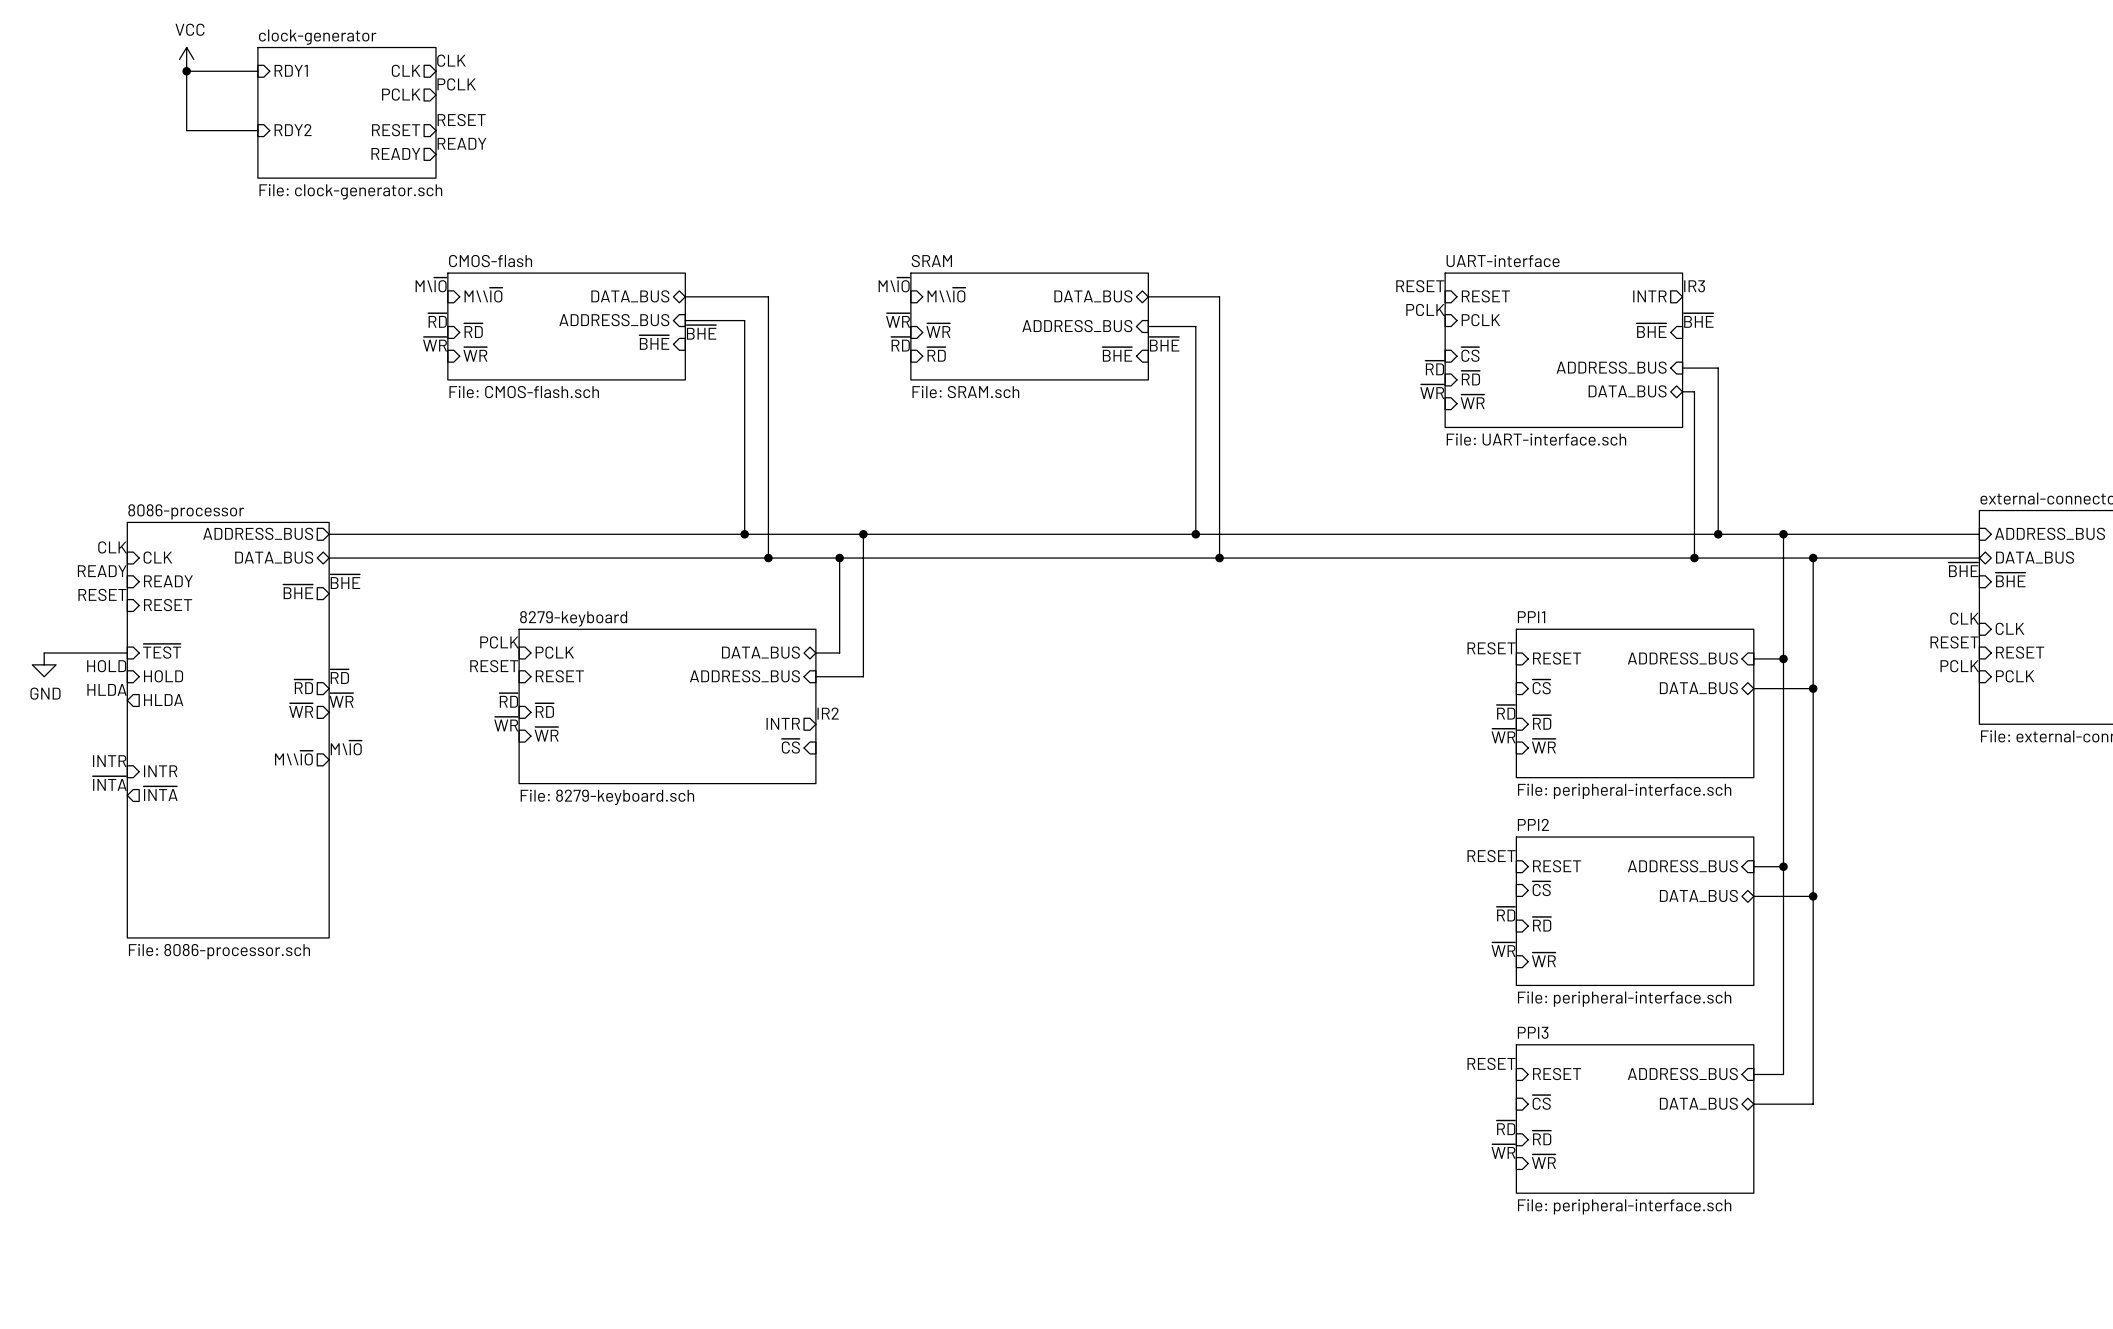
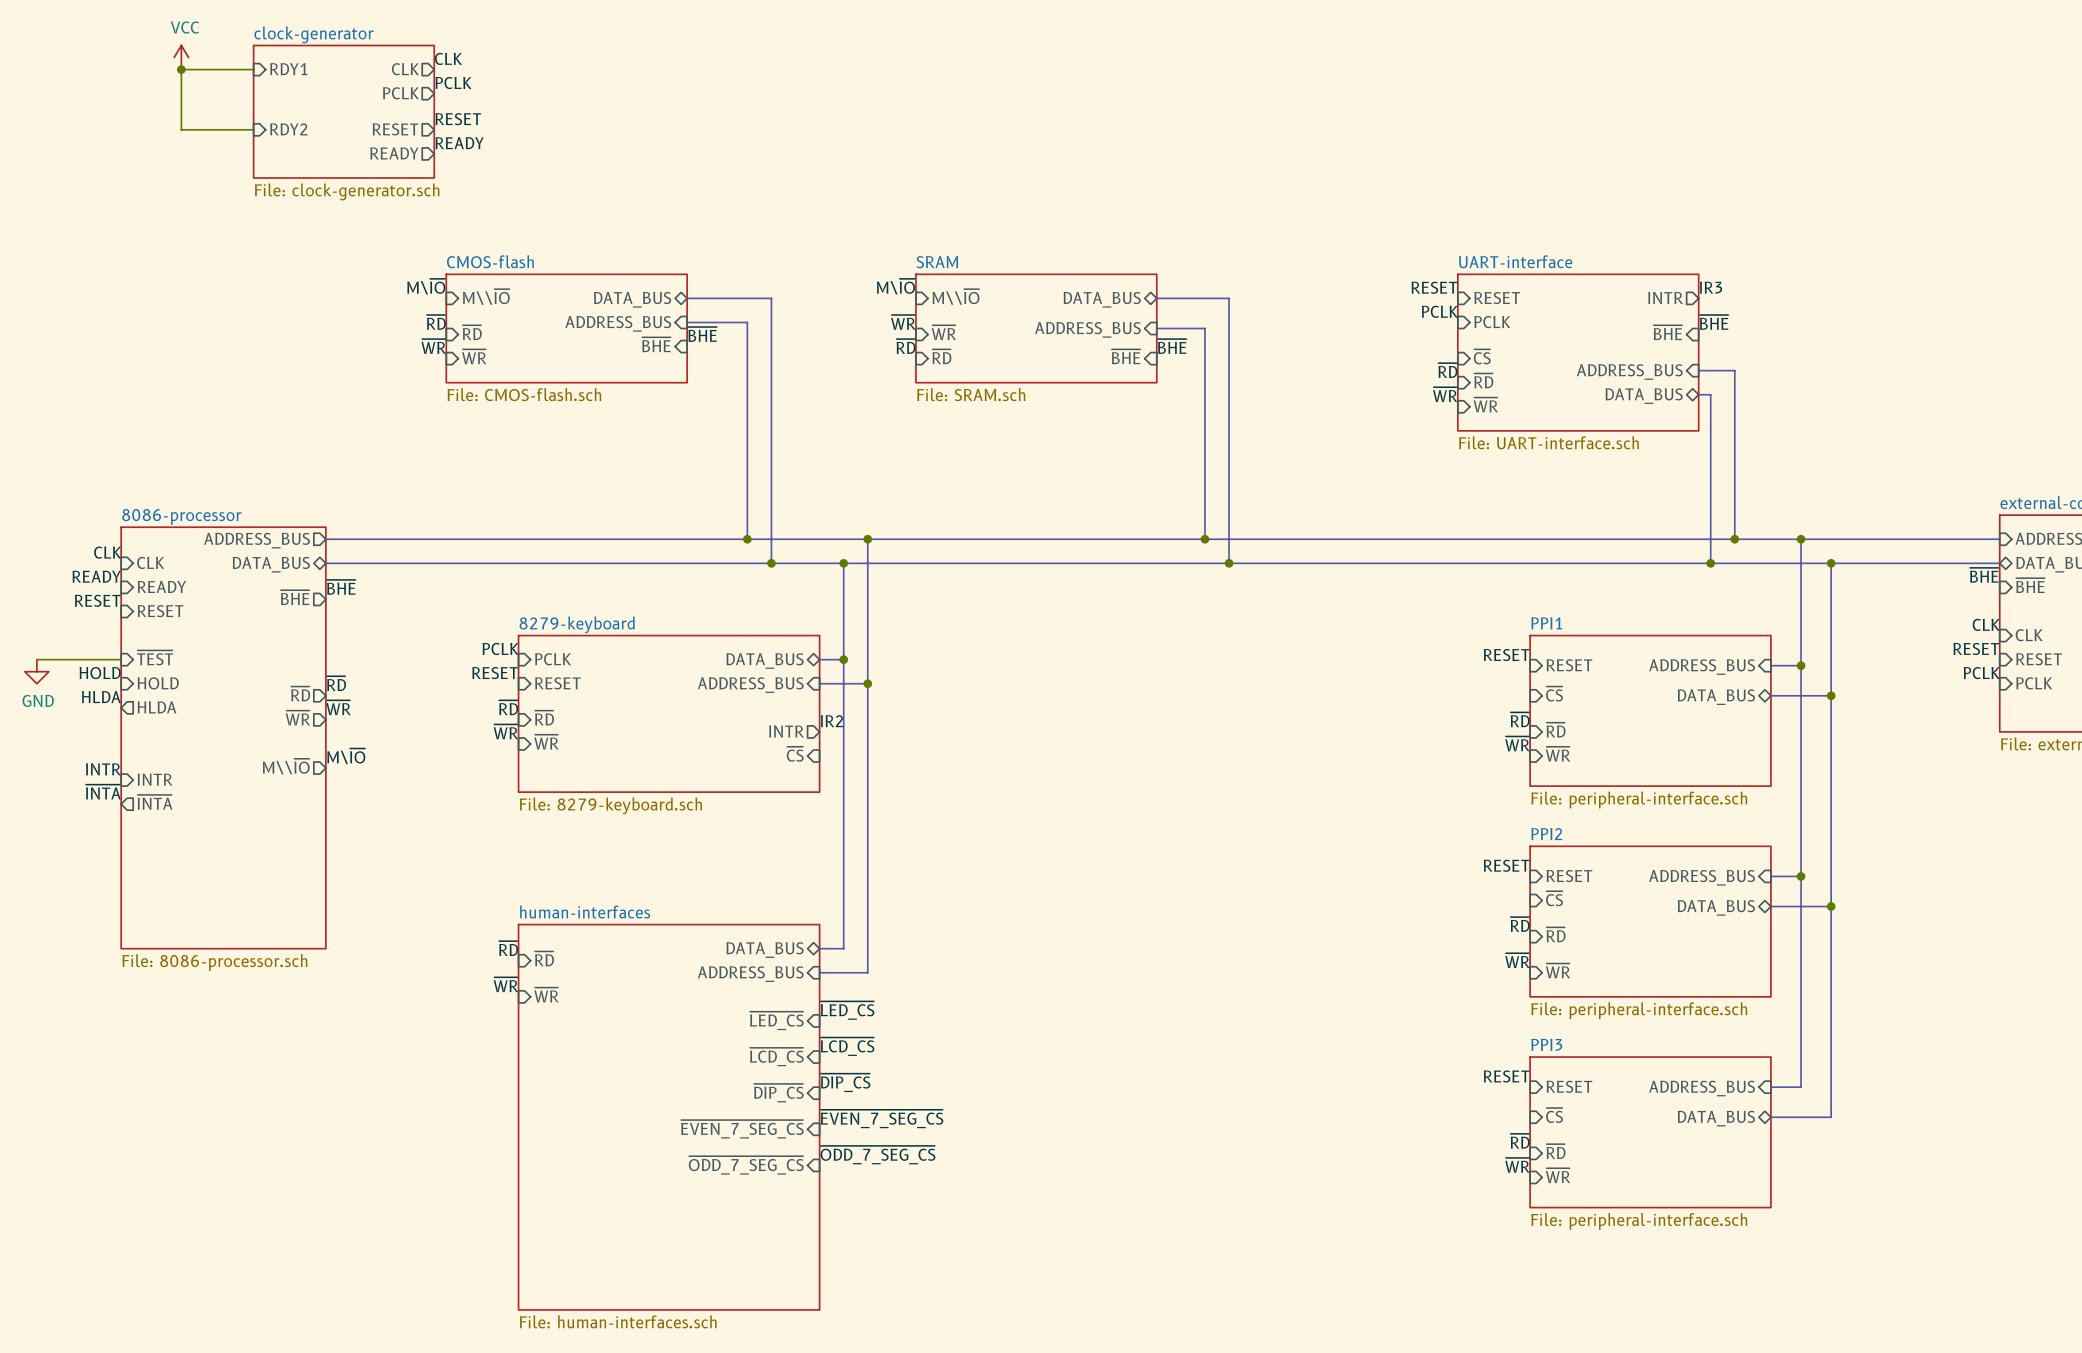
bus: none -> (843, 659) (843, 948) (819, 948)
junction: none -> (843, 659)
bus: none -> (867, 683) (867, 972) (819, 972)
junction: none -> (867, 683)
label: none -> ~{RD} (508, 948)
sheet pin: none -> DATA_BUS (765, 950)
sheet pin: none -> ~{RD} (544, 958)
sheet pin: none -> ADDRESS_BUS (750, 974)
label: none -> ~{WR} (505, 984)
sheet pin: none -> ~{WR} (546, 995)
label: none -> ~{LED_CS} (847, 1010)
sheet pin: none -> ~{LED_CS} (776, 1020)
label: none -> ~{LCD_CS} (847, 1046)
sheet pin: none -> ~{LCD_CS} (776, 1057)
label: none -> ~{DIP_CS} (845, 1082)
sheet pin: none -> ~{DIP_CS} (778, 1093)
sheet human-interfaces: none -> File: human-interfaces.sch (669, 1117)
label: none -> ~{EVEN_7_SEG_CS} (882, 1118)
sheet pin: none -> ~{EVEN_7_SEG_CS} (742, 1129)
label: none -> ~{ODD_7_SEG_CS} (877, 1155)
sheet pin: none -> ~{ODD_7_SEG_CS} (746, 1165)

